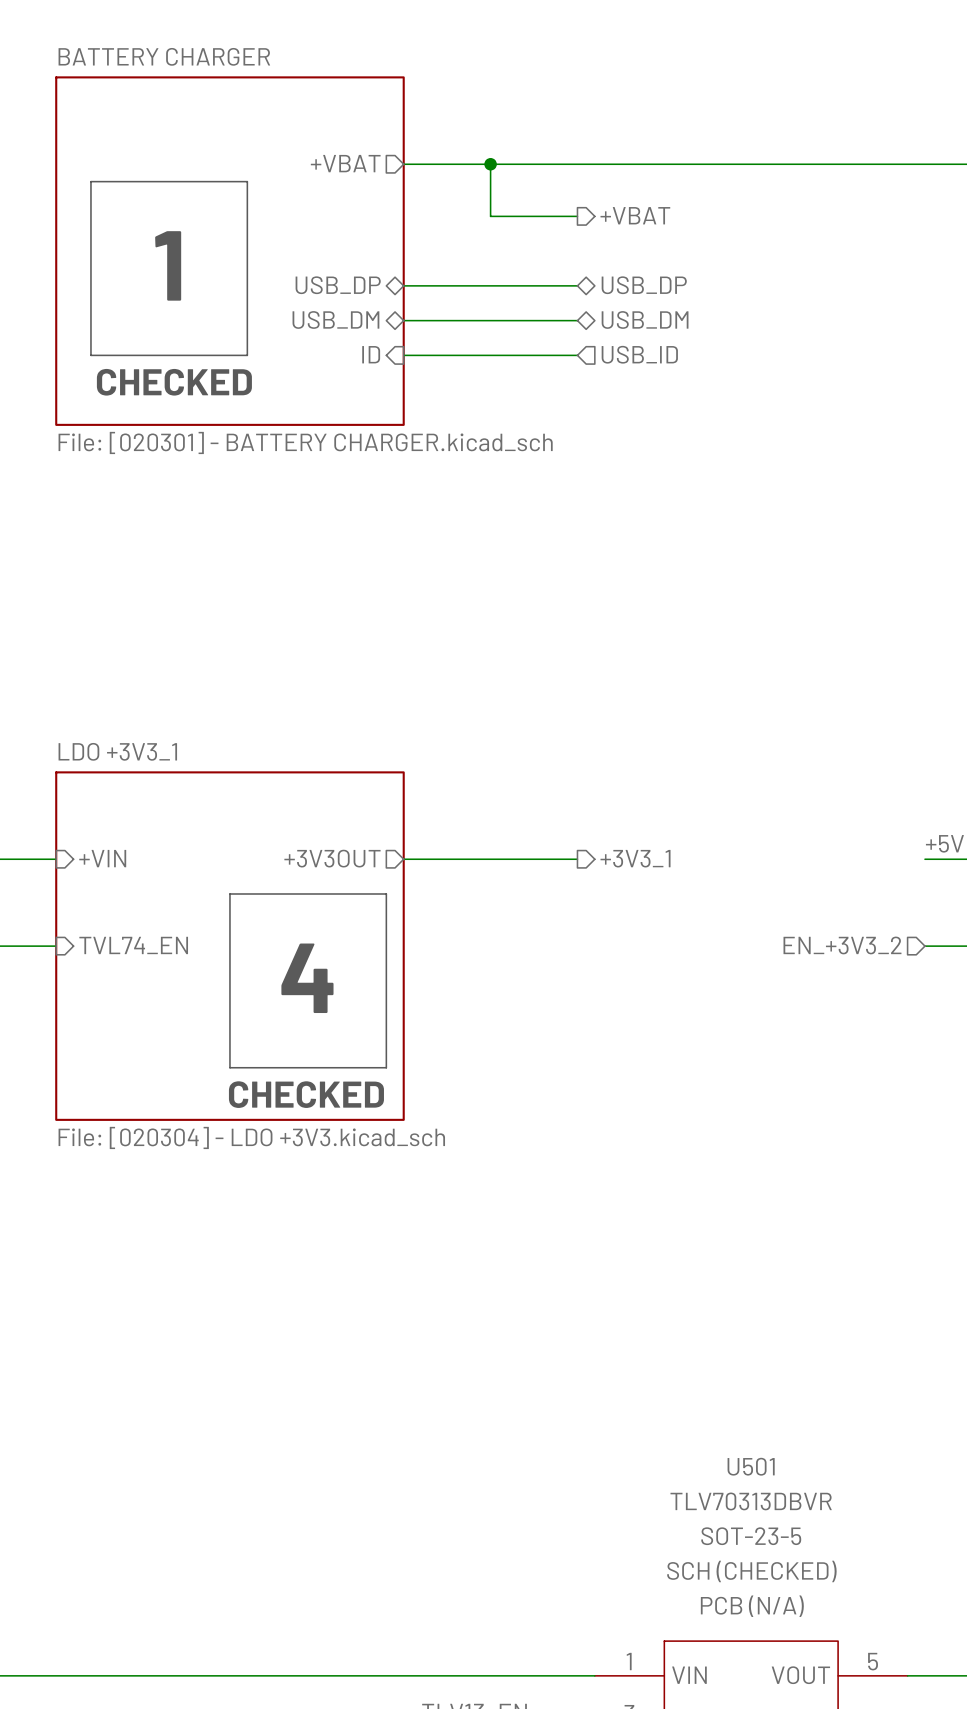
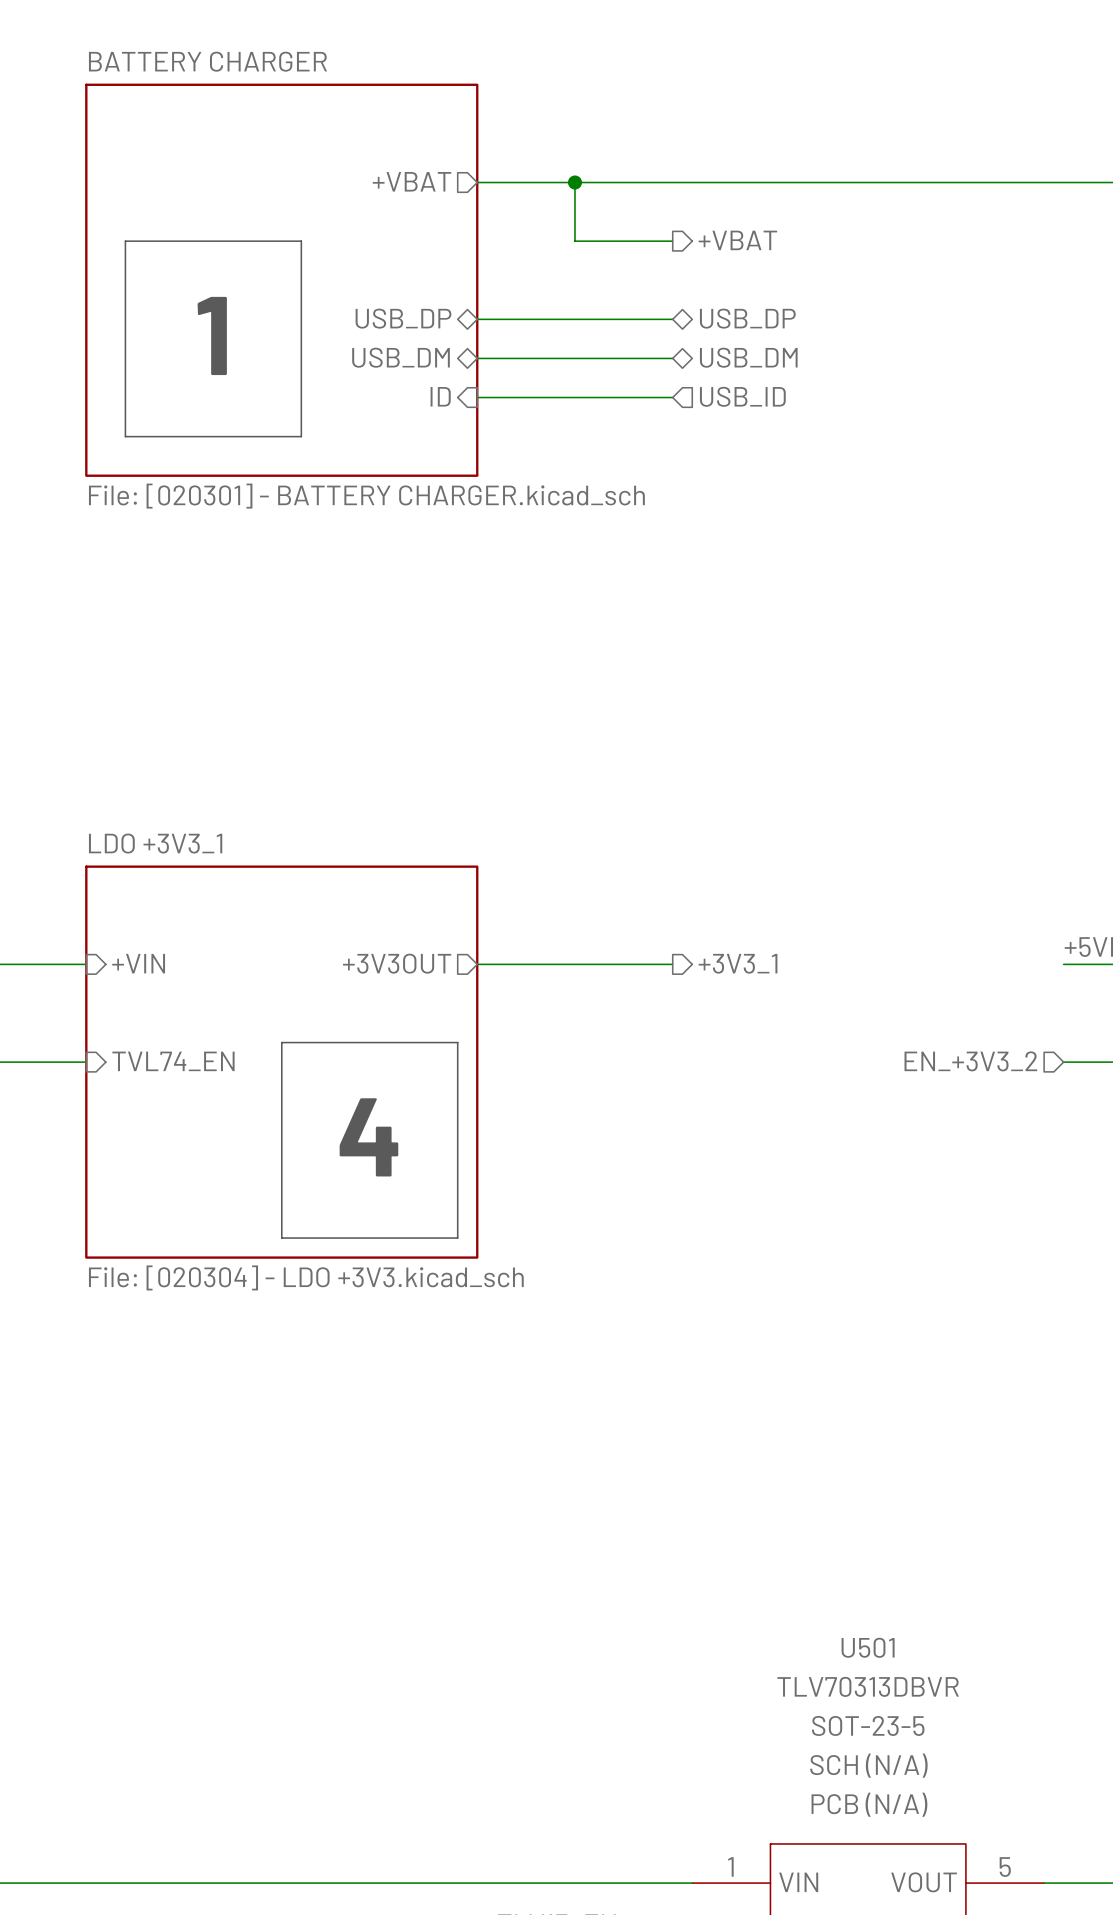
line: (90, 216) (90, 181) (247, 181) (247, 216) -> (125, 241) (301, 241)
text position: 1 (168, 265) -> 1 (212, 335)
line: (90, 355) (247, 355) -> (125, 397) (125, 436) (301, 436) (301, 397)
text: CHECKED (174, 382) -> none
line: (229, 928) (229, 893) (386, 893) (386, 928) -> (281, 1042) (457, 1042)
text position: 4 (307, 978) -> 4 (368, 1137)
line: (229, 1067) (386, 1067) -> (281, 1198) (281, 1238) (457, 1238) (457, 1198)
text: CHECKED (306, 1094) -> none
U501 text: SCH (CHECKED) (751, 1571) -> SCH (N/A) (868, 1765)

